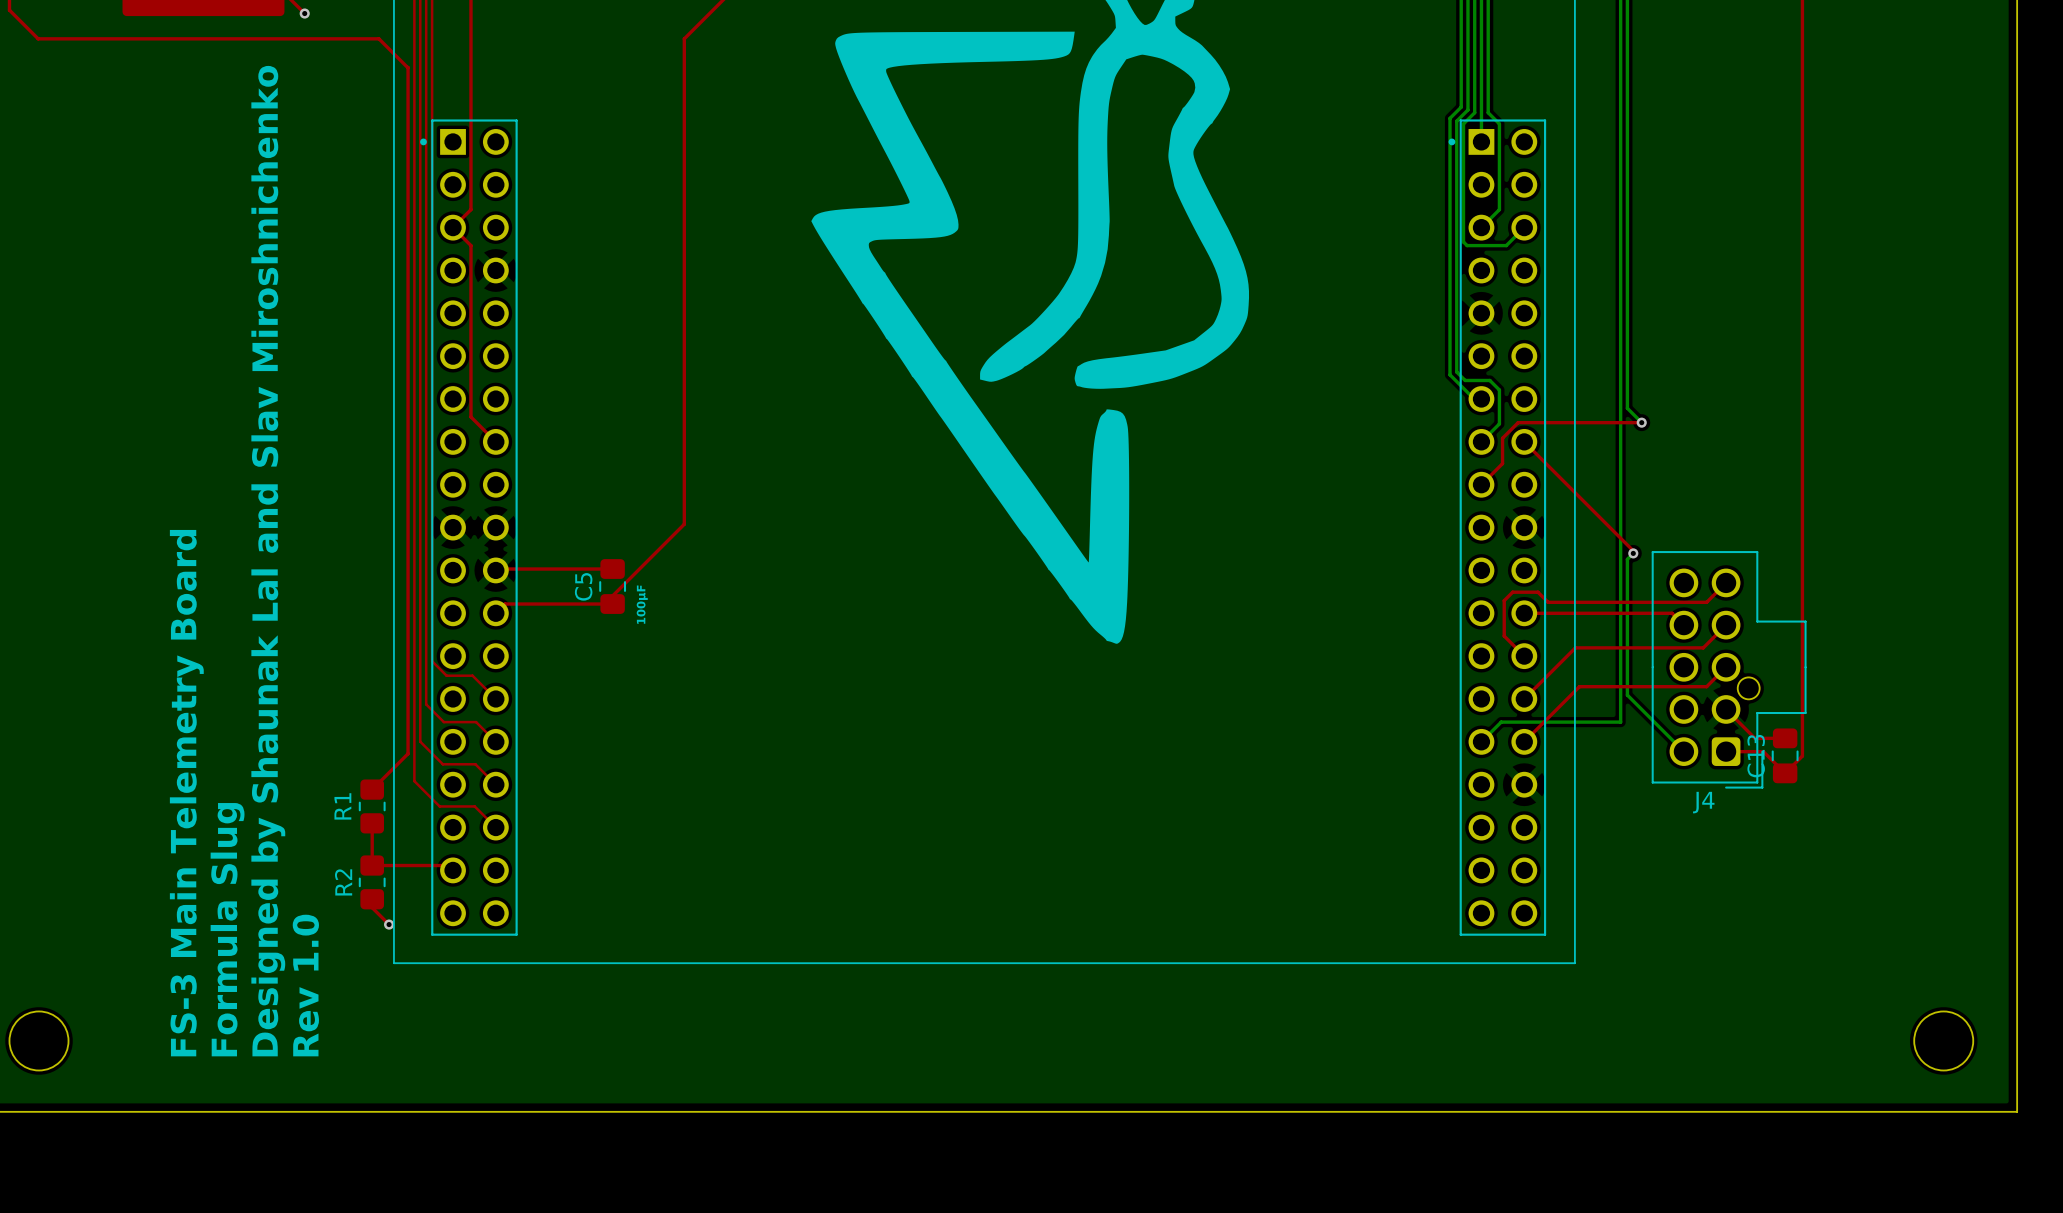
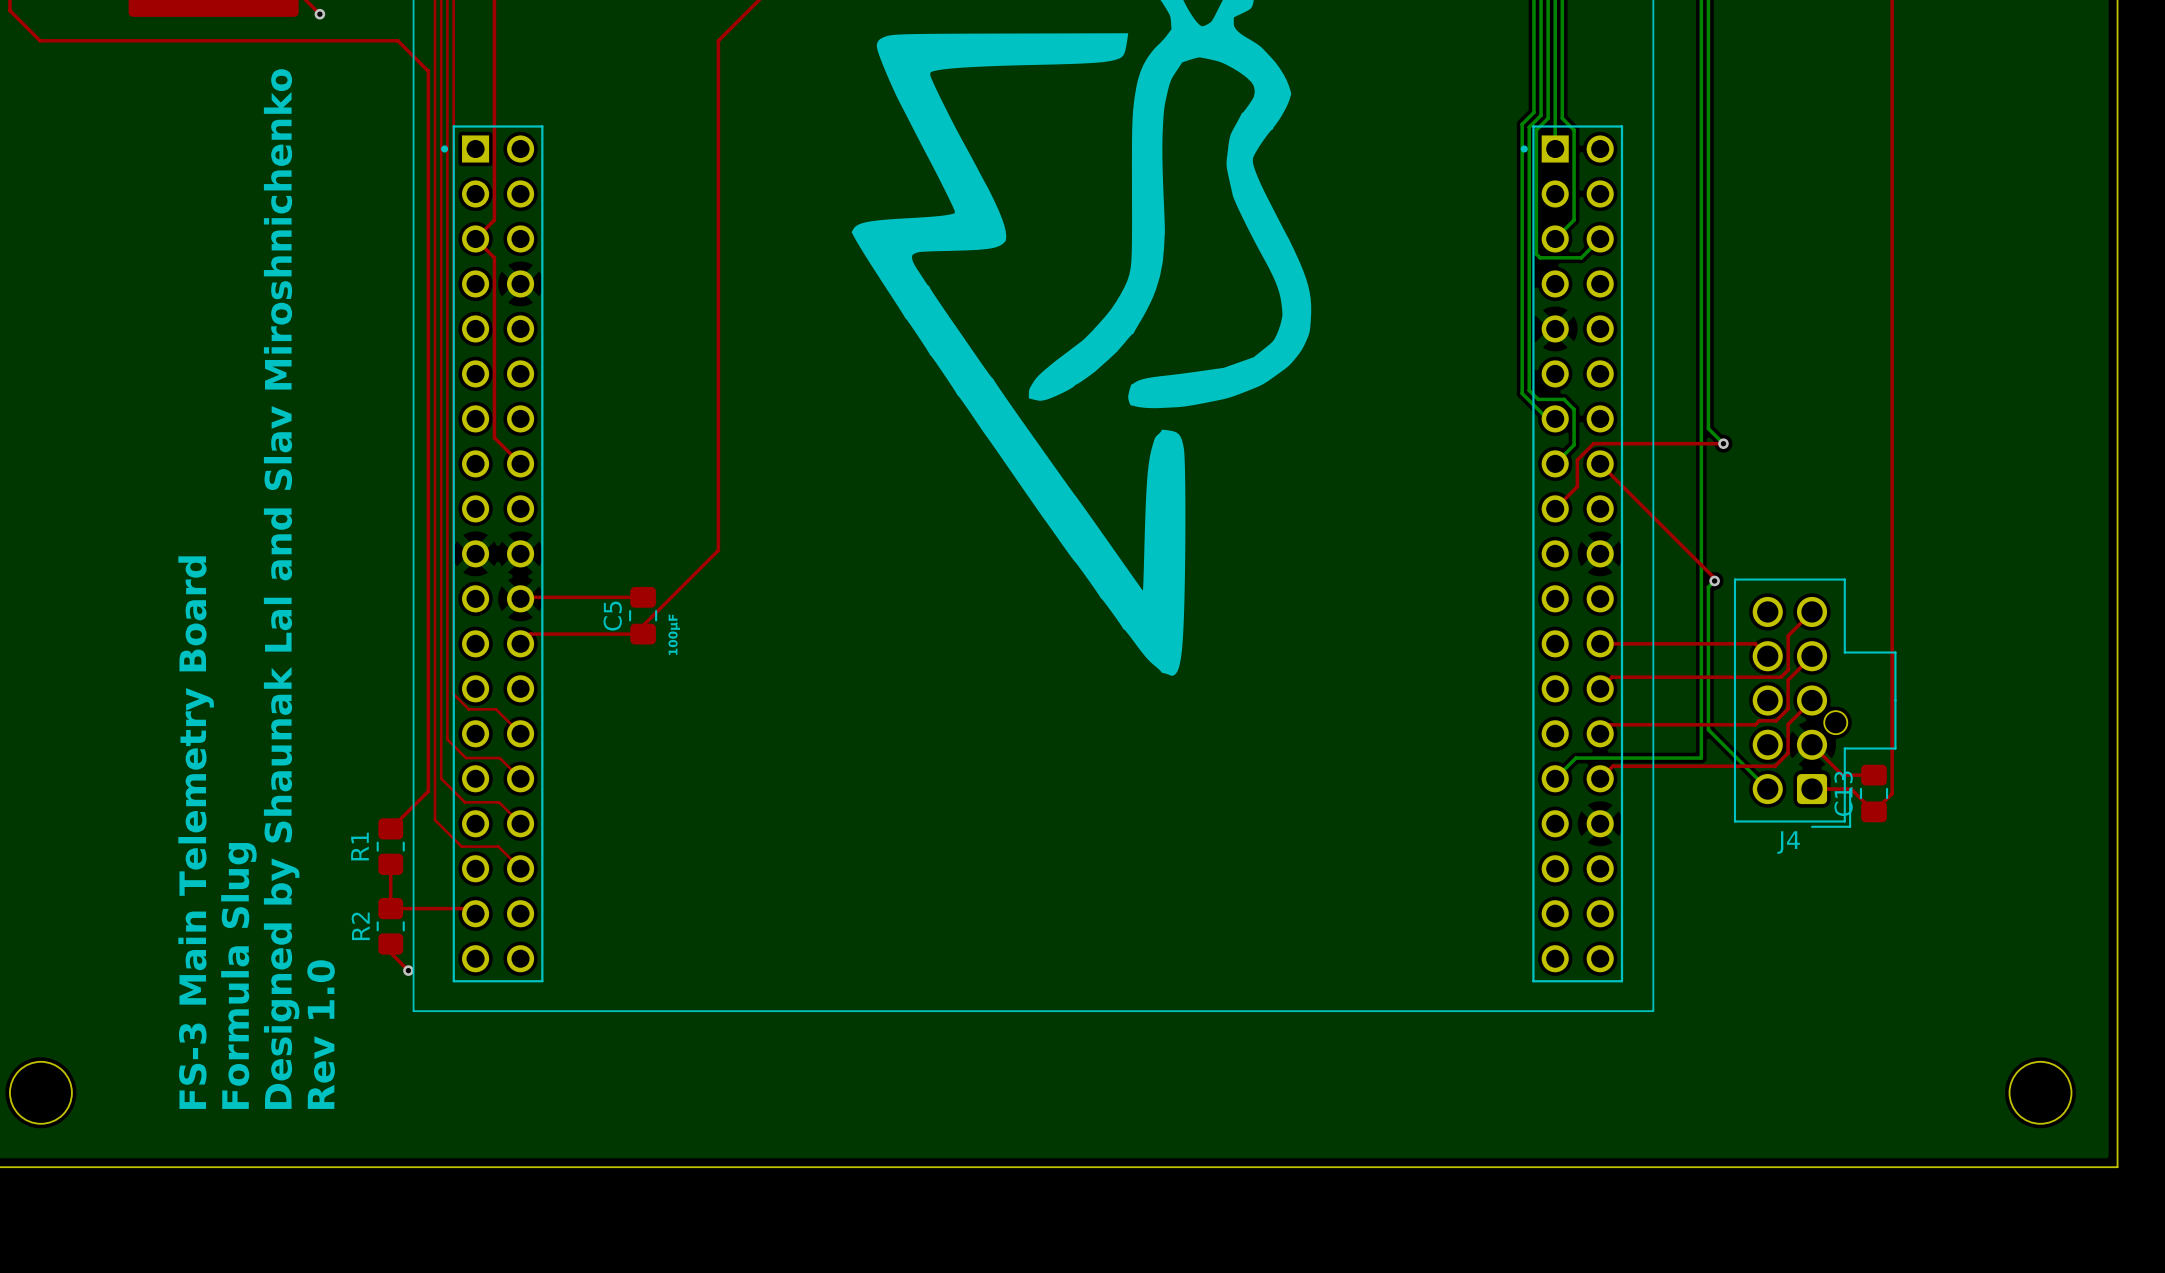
top track: (1706, 602) (1548, 602) (1537, 592) (1512, 592) (1504, 600) (1504, 636) (1524, 656) -> (1791, 632) (1788, 635) (1788, 670) (1781, 677) (1611, 677) (1600, 688)
top track: (1703, 647) (1575, 647) (1532, 690) -> (1759, 720) (1755, 724) (1609, 724)
top track: (1675, 686) (1579, 686) (1536, 729) -> (1791, 720) (1788, 724) (1788, 753) (1775, 766) (1612, 766)
top track: (1691, 686) (1706, 686) -> (1776, 720) (1788, 708) (1788, 680)

